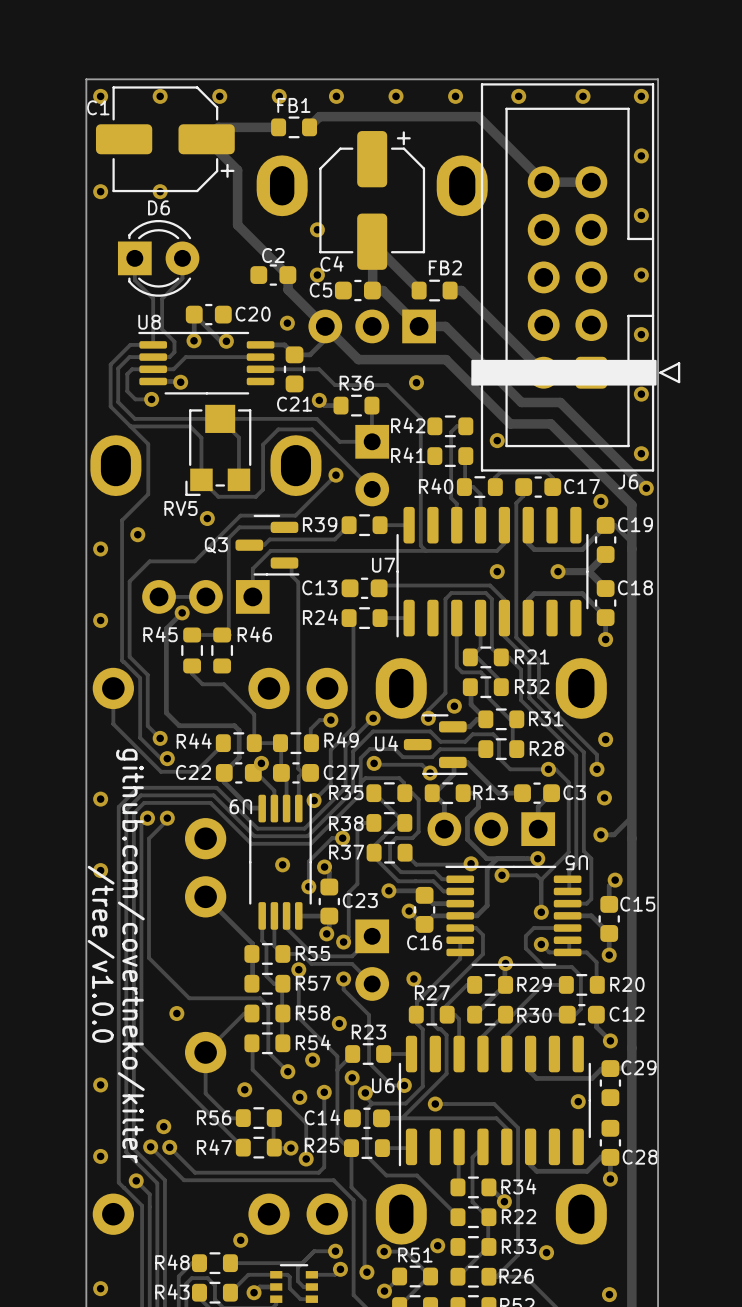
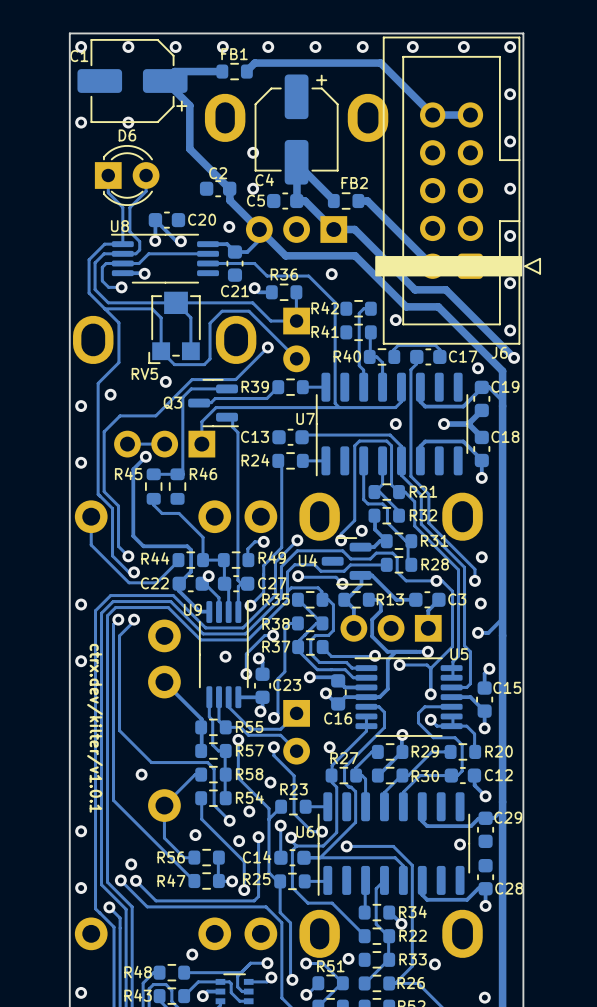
U9 name rotation: 0° (240, 806) -> 180° (192, 609)
U5 name rotation: 0° (576, 862) -> 180° (459, 654)
text: /tree/v1.0.0 (101, 954) -> none
text: none -> ctrx.dev/kilter/v1.0.1 (94, 728)
text: github.com/covertneko/kilter (130, 956) -> none

